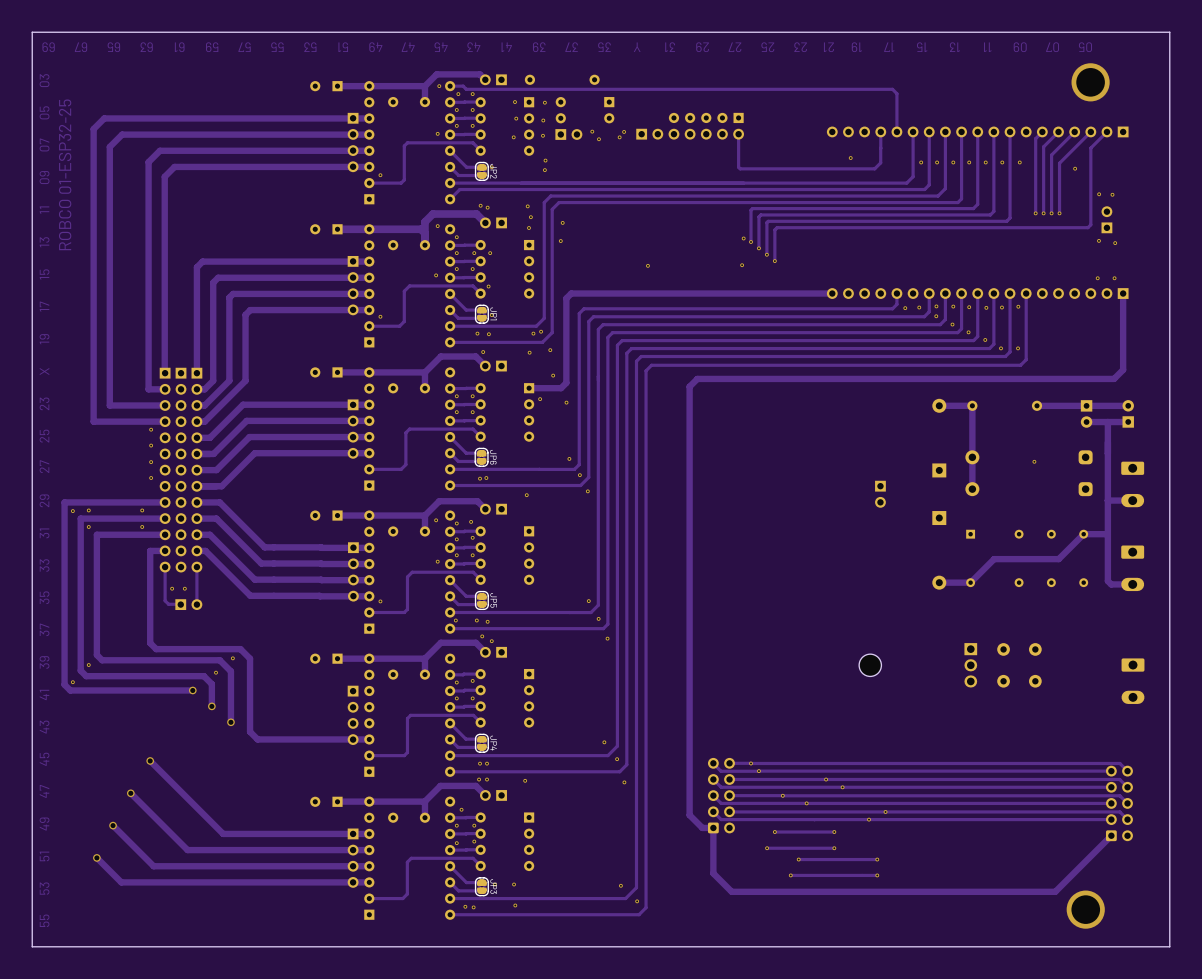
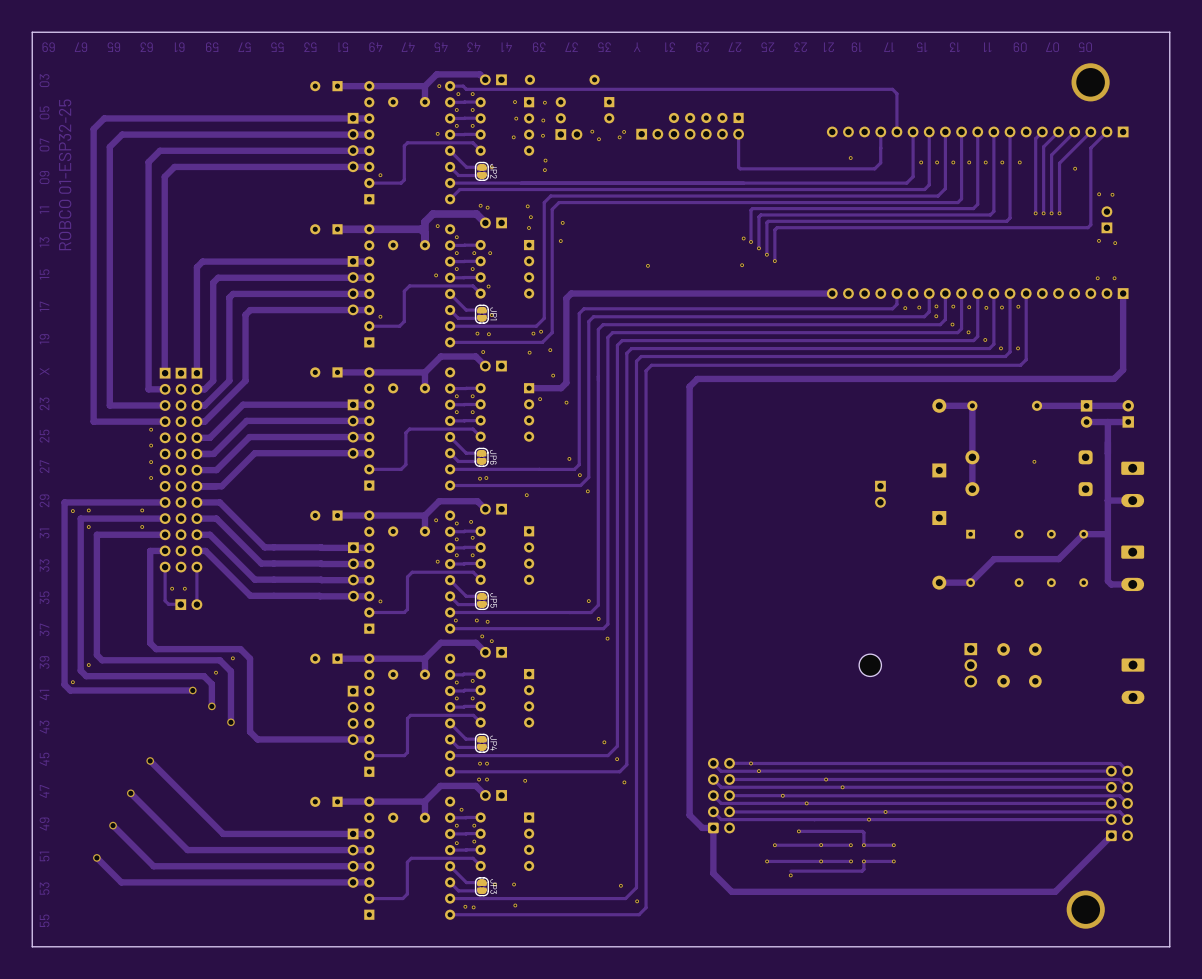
track: none -> (798, 831) (862, 831) (863, 845) (893, 845)
via: none -> (798, 831)
via: (774, 832) -> none
track: (834, 832) (774, 832) -> none
via: (834, 832) -> none
via: none -> (774, 845)
via: none -> (821, 845)
track: none -> (850, 845) (774, 845)
via: none -> (850, 845)
via: none -> (863, 845)
via: none -> (893, 845)
via: (767, 848) -> none
track: (834, 848) (767, 848) -> none
via: (834, 848) -> none
via: (798, 859) -> none
track: (877, 859) (798, 859) -> none
via: (877, 859) -> none
via: none -> (767, 861)
via: none -> (821, 861)
track: none -> (851, 861) (767, 861)
via: none -> (851, 861)
via: none -> (863, 861)
track: none -> (893, 861) (863, 861) (862, 871) (790, 871)
via: none -> (893, 861)
track: (877, 875) (790, 875) -> none
via: (877, 875) -> none

